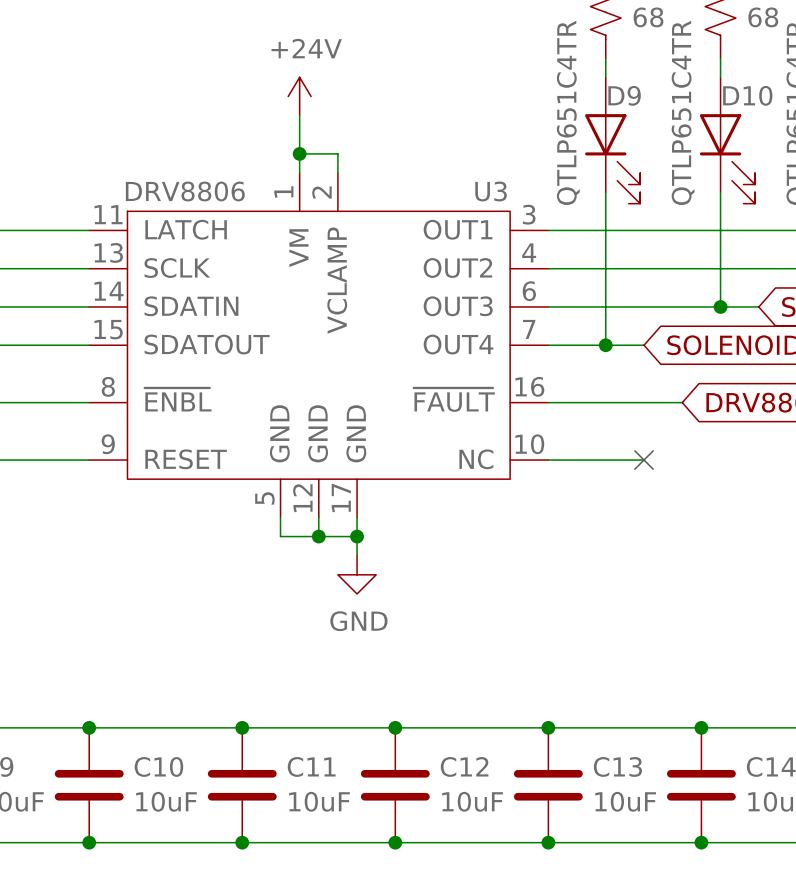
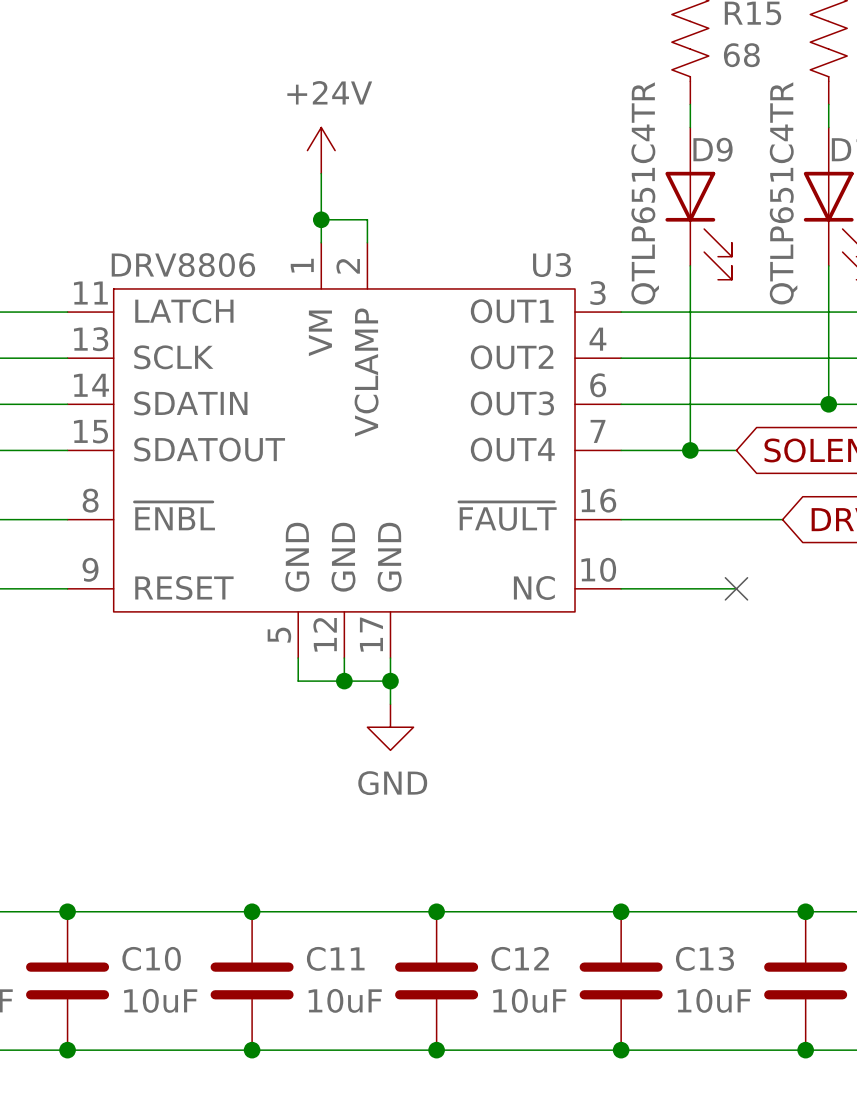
D9 value position: QTLP651C4TR (568, 112) -> QTLP651C4TR (645, 193)
D10 value position: QTLP651C4TR (683, 112) -> QTLP651C4TR (783, 193)

